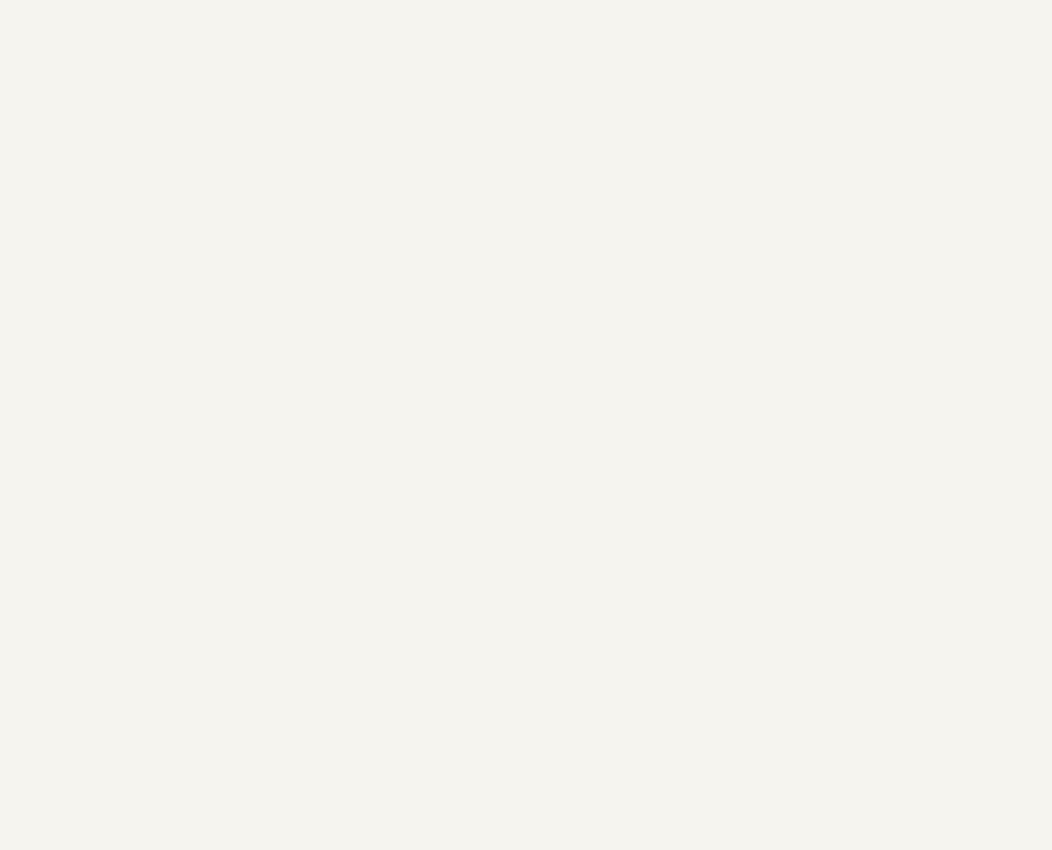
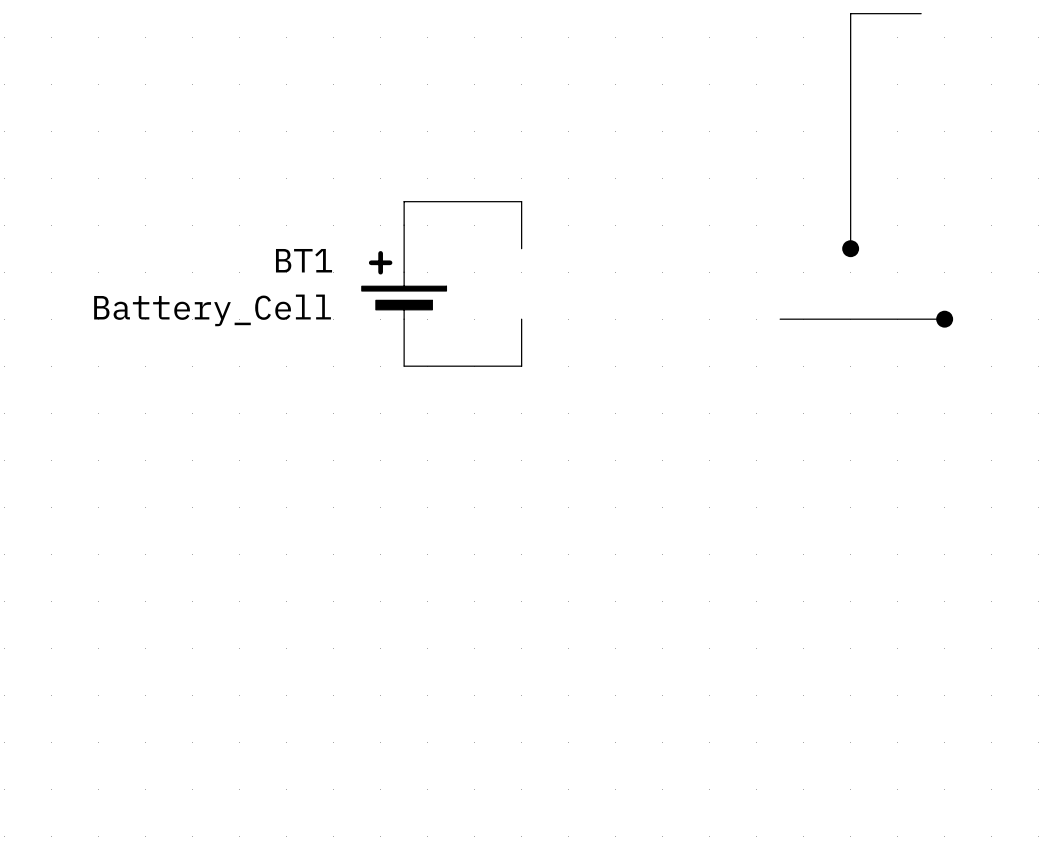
wire: none -> (921, 13) (850, 13) (850, 248)
wire: none -> (404, 225) (404, 201) (521, 201) (521, 248)
junction: none -> (850, 248)
BT1: none -> Battery_Cell (404, 295)
wire: none -> (521, 319) (521, 366) (404, 366)
wire: none -> (780, 319) (944, 319)
junction: none -> (944, 319)

